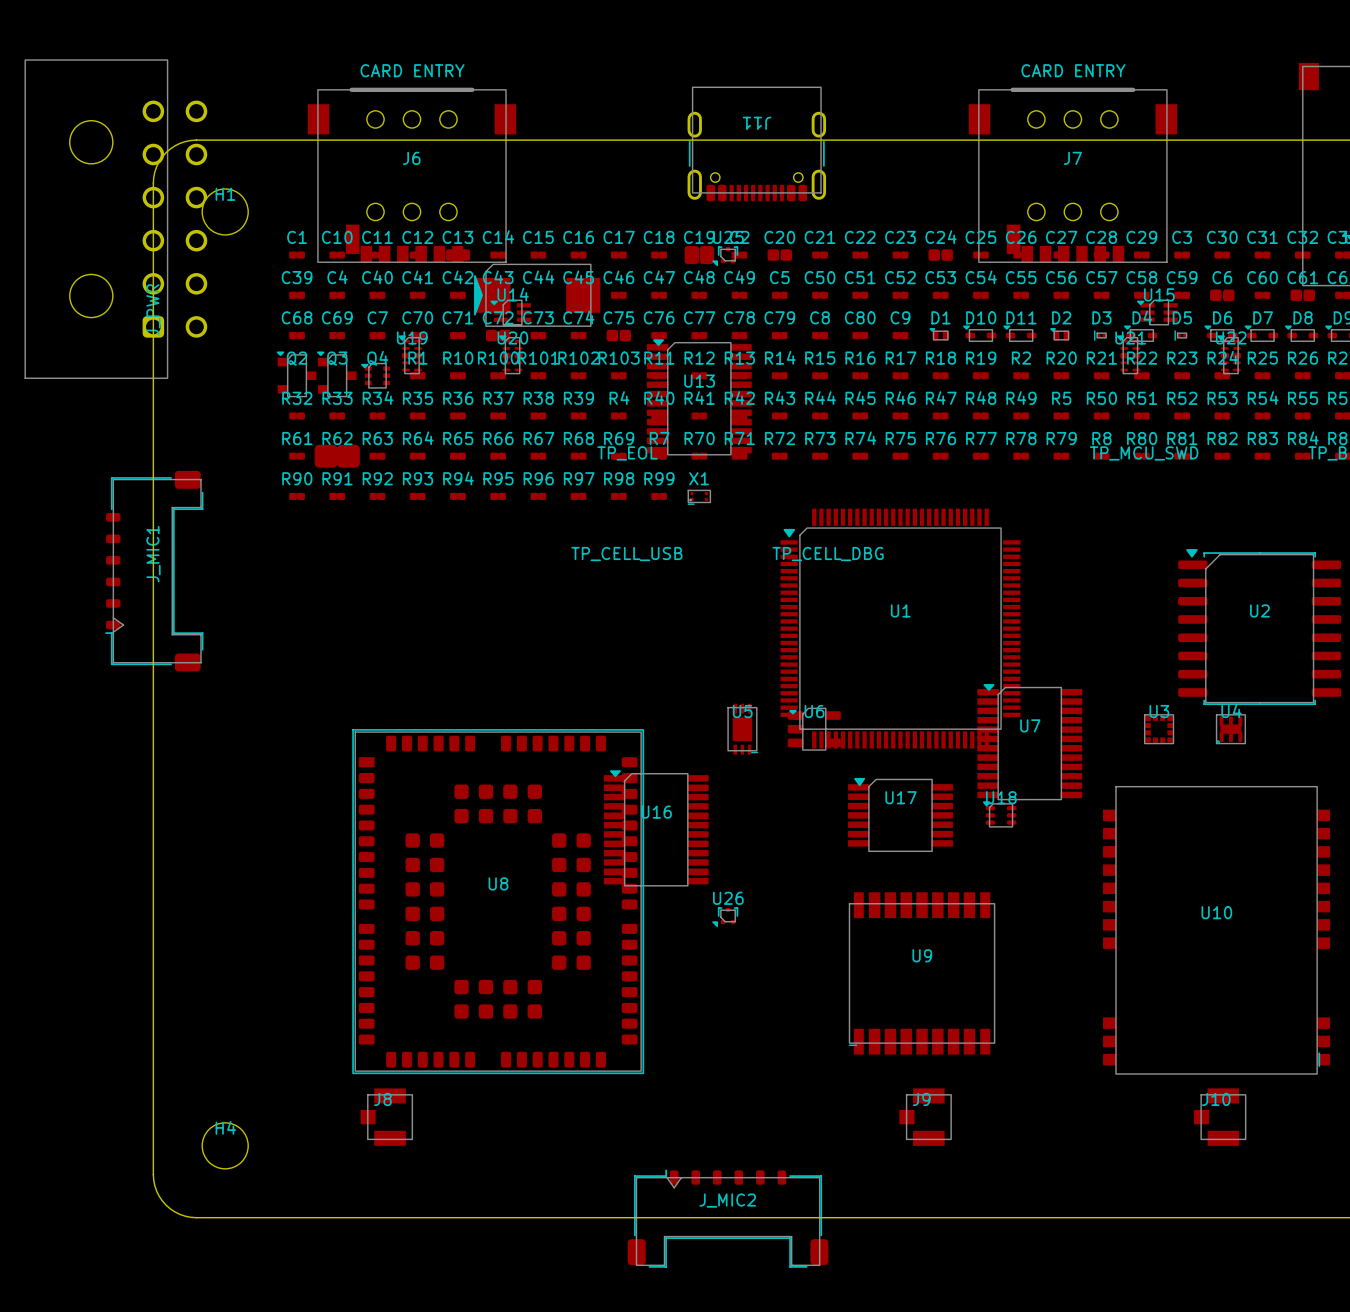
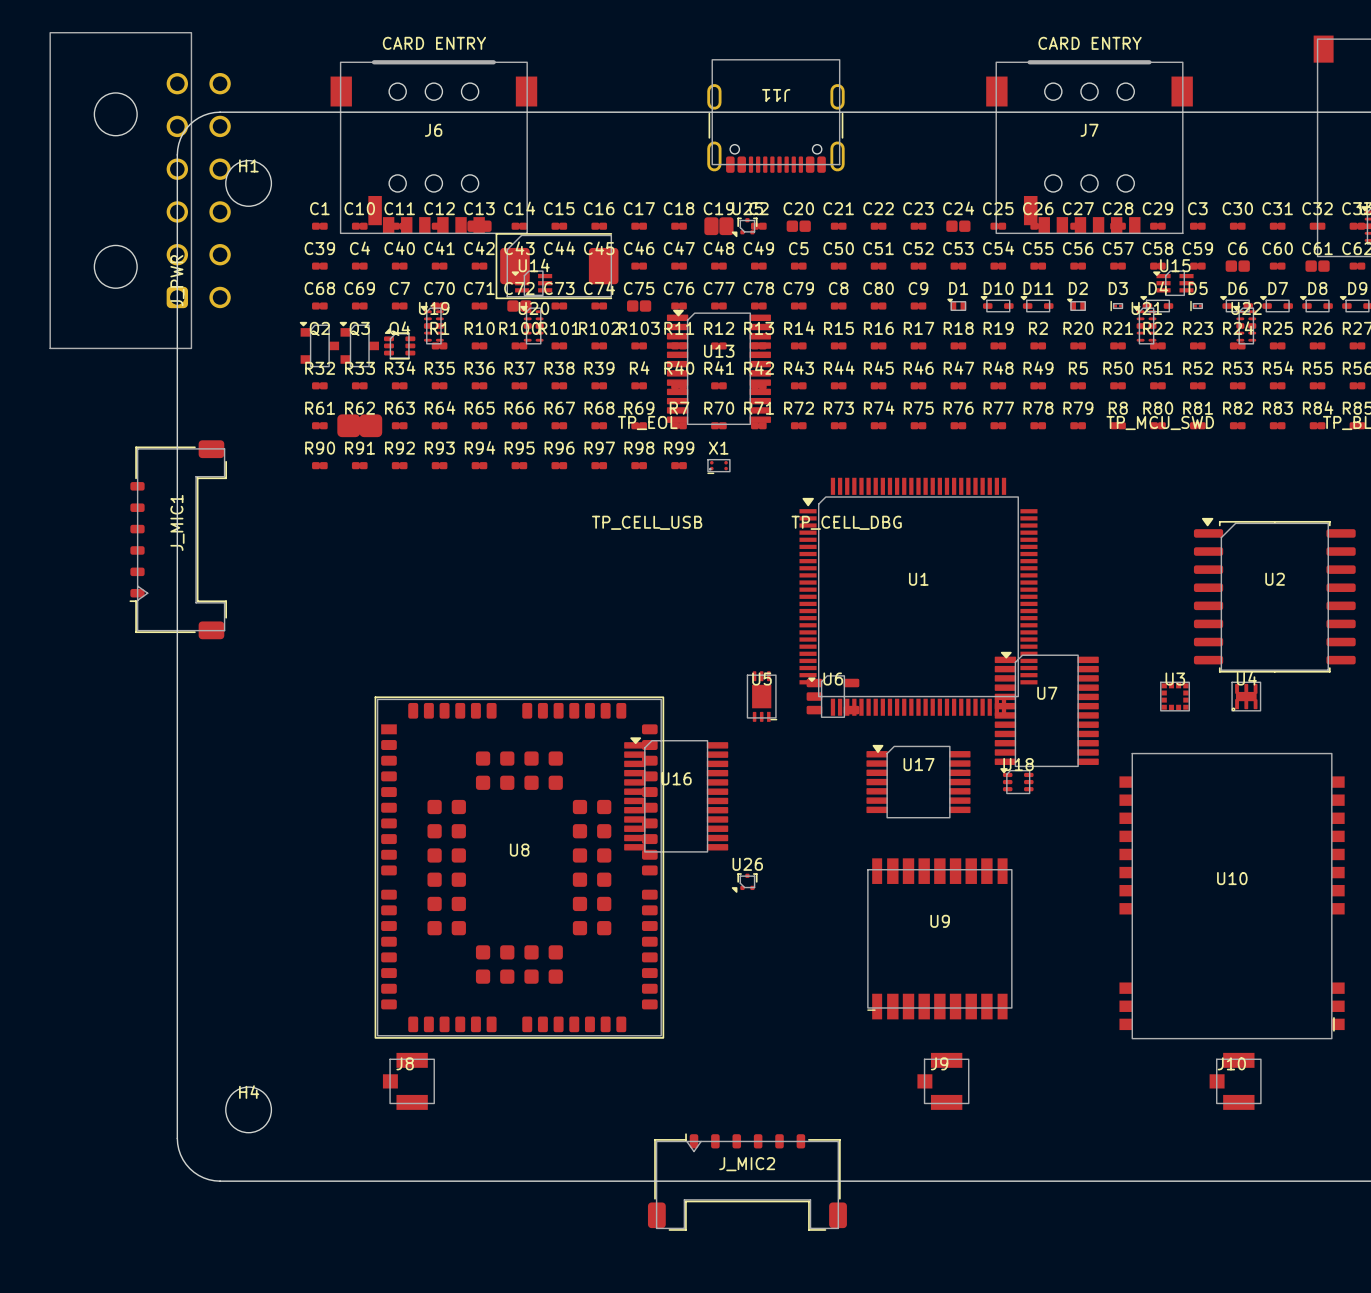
C44 footprint: [474, 263, 601, 327] -> [495, 233, 619, 300]
Q4 footprint: [361, 362, 391, 389] -> [384, 328, 416, 360]

